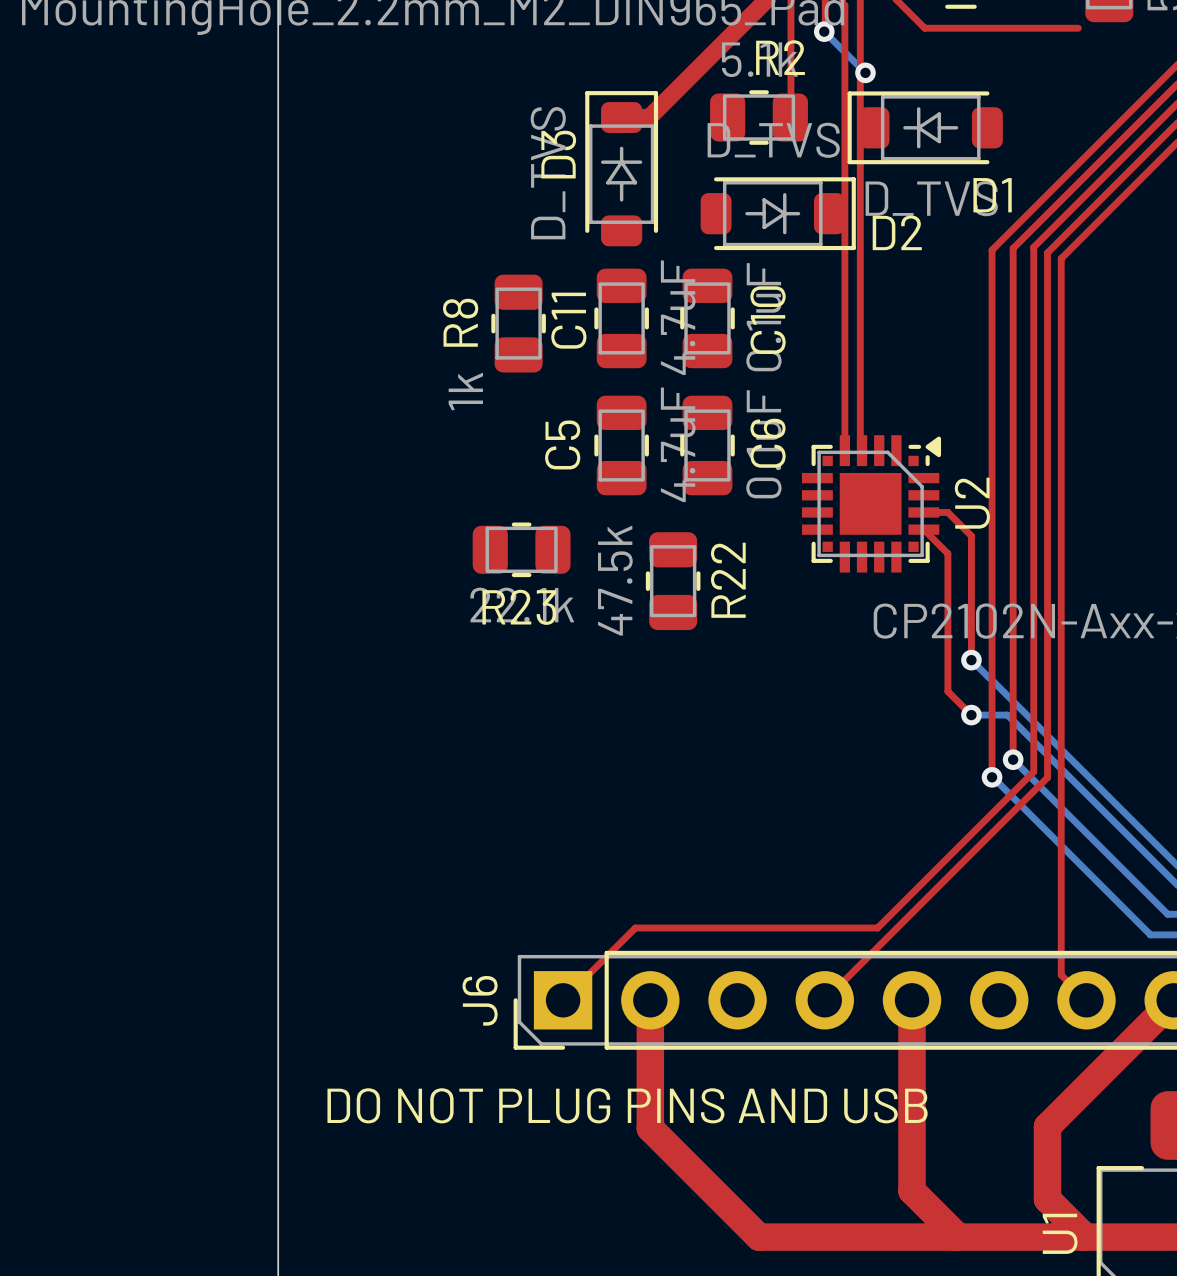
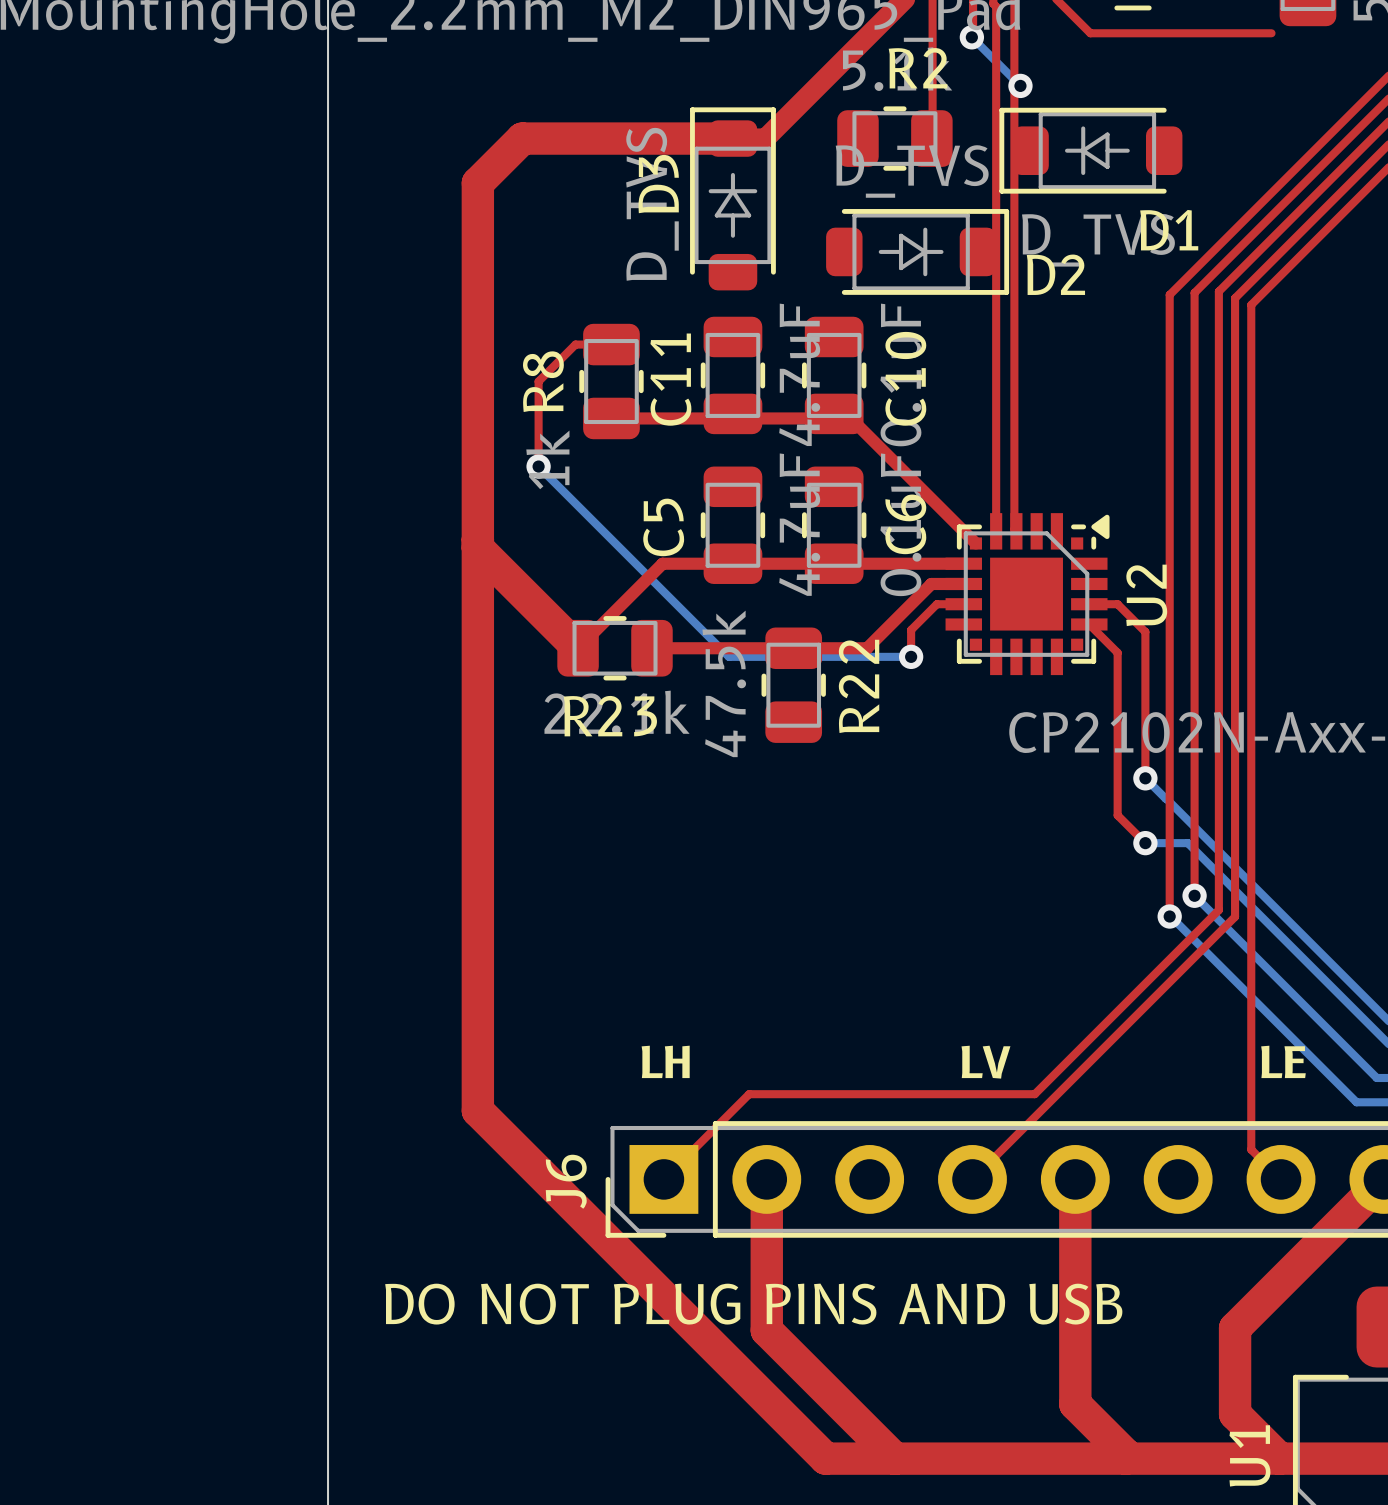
top track: none -> (732, 138) (522, 138) (477, 183) (477, 1110) (825, 1458) (894, 1458)
top track: none -> (611, 344) (575, 344) (538, 381) (538, 466)
top track: none -> (611, 418) (850, 418) (975, 543)
bottom track: none -> (538, 466) (728, 656) (911, 656)
via: none -> (538, 466)
top track: none -> (477, 548) (578, 648) (662, 563) (963, 563)
top track: none -> (963, 583) (931, 583) (867, 648) (651, 648)
top track: none -> (963, 604) (936, 604) (911, 629) (911, 656)
via: none -> (911, 656)
text: none -> LH (665, 1061)
text: none -> LV (985, 1062)
text: none -> LE (1283, 1061)

